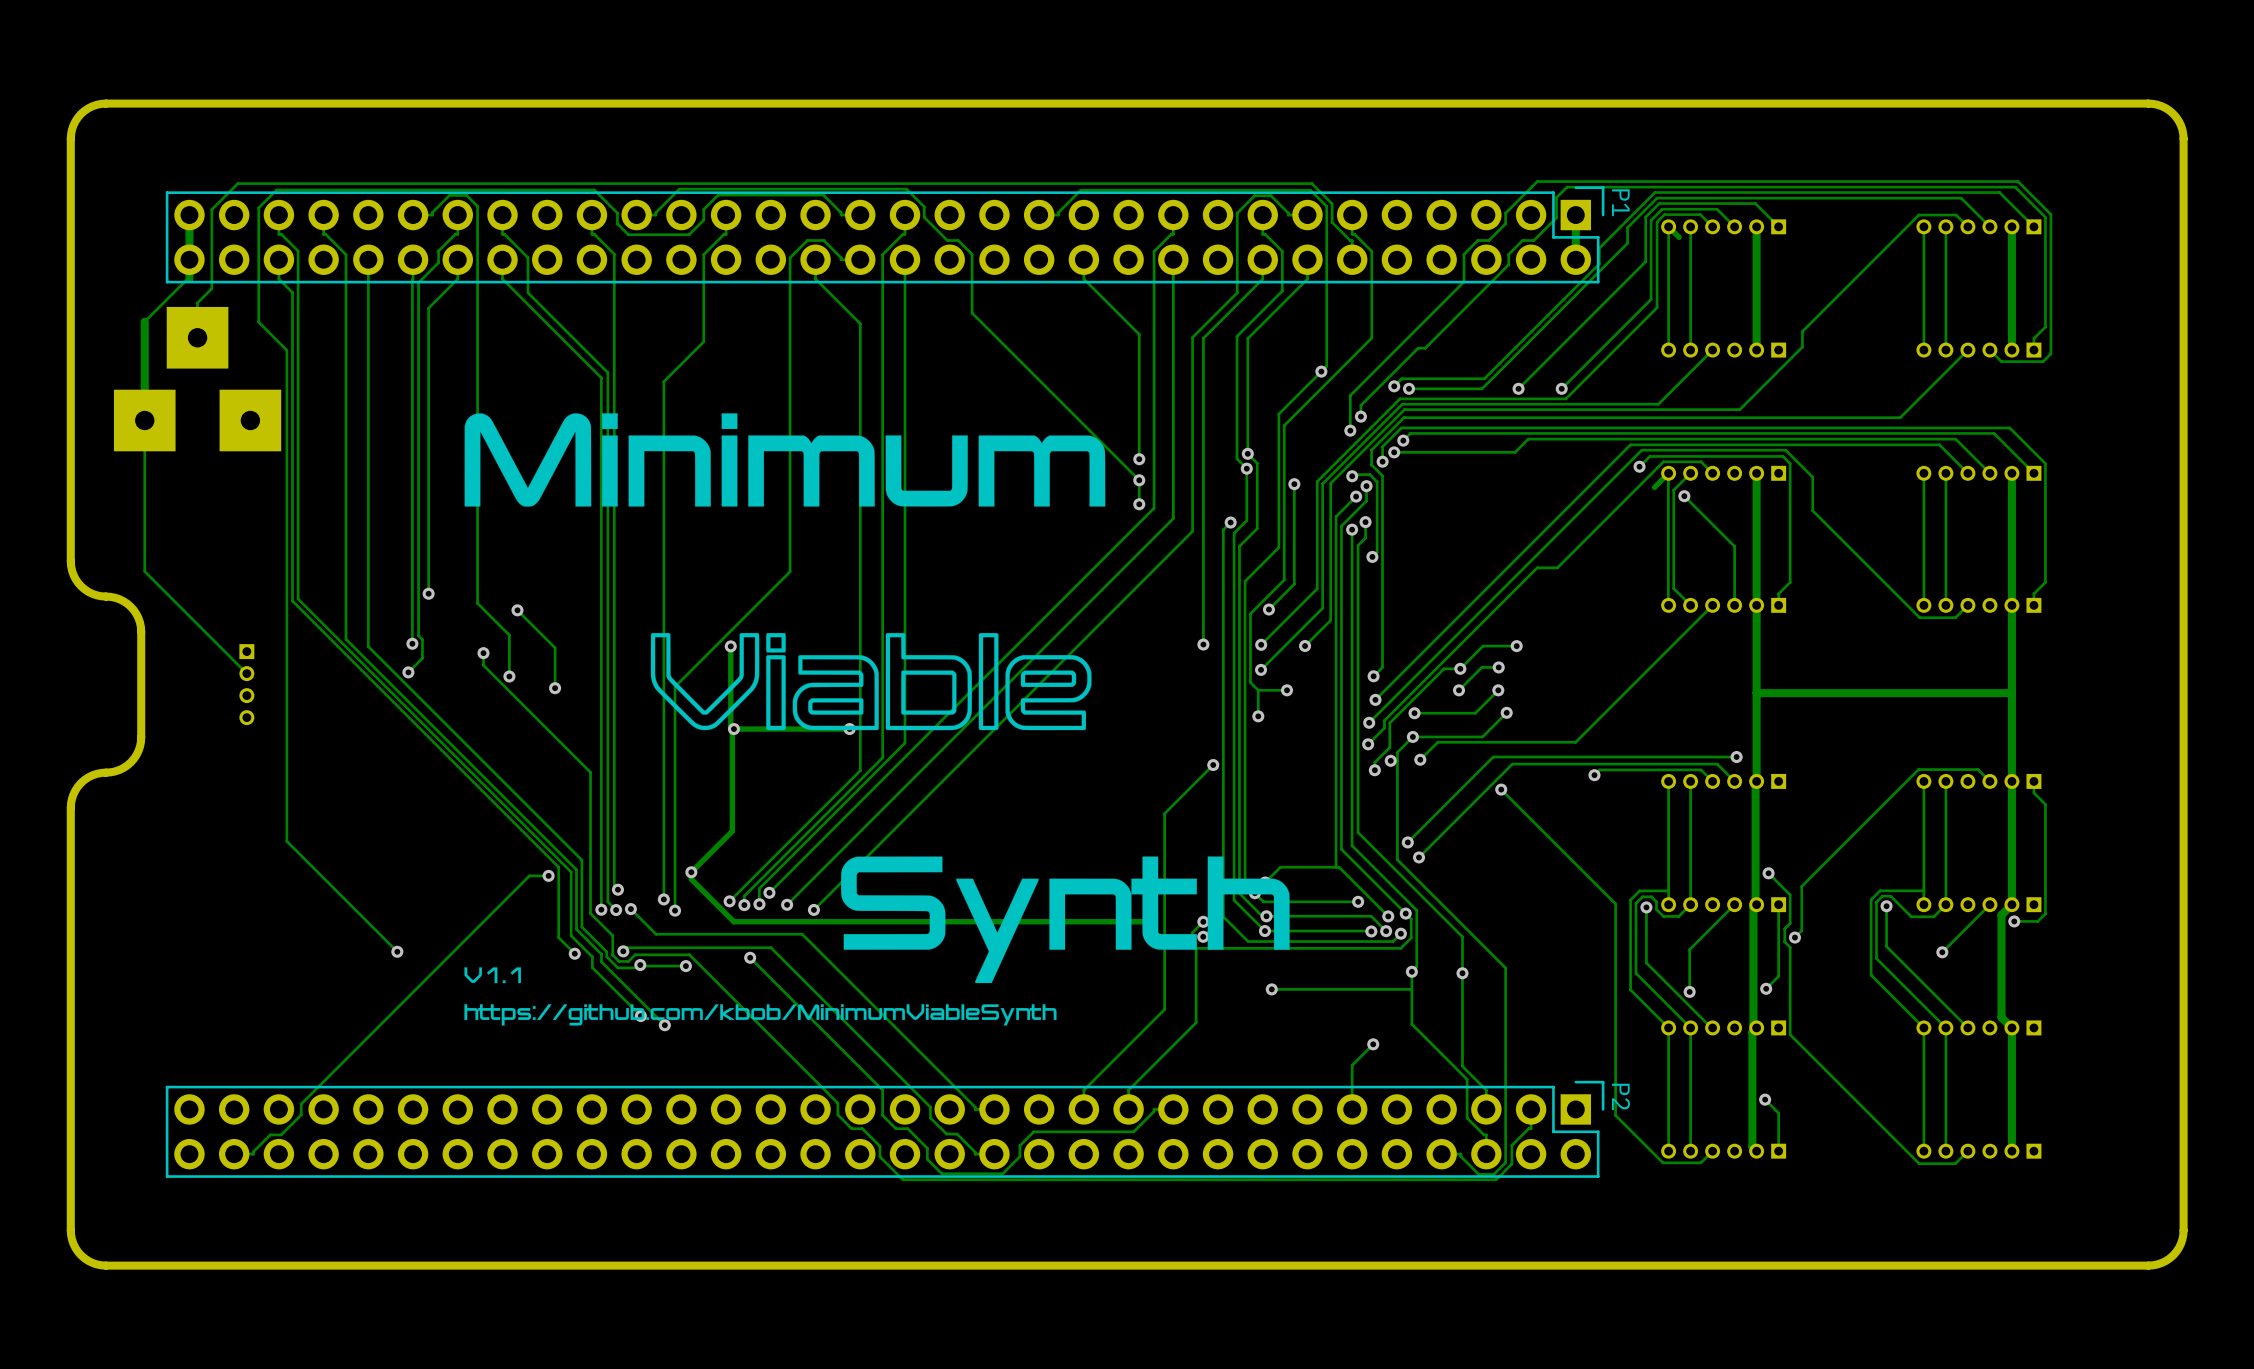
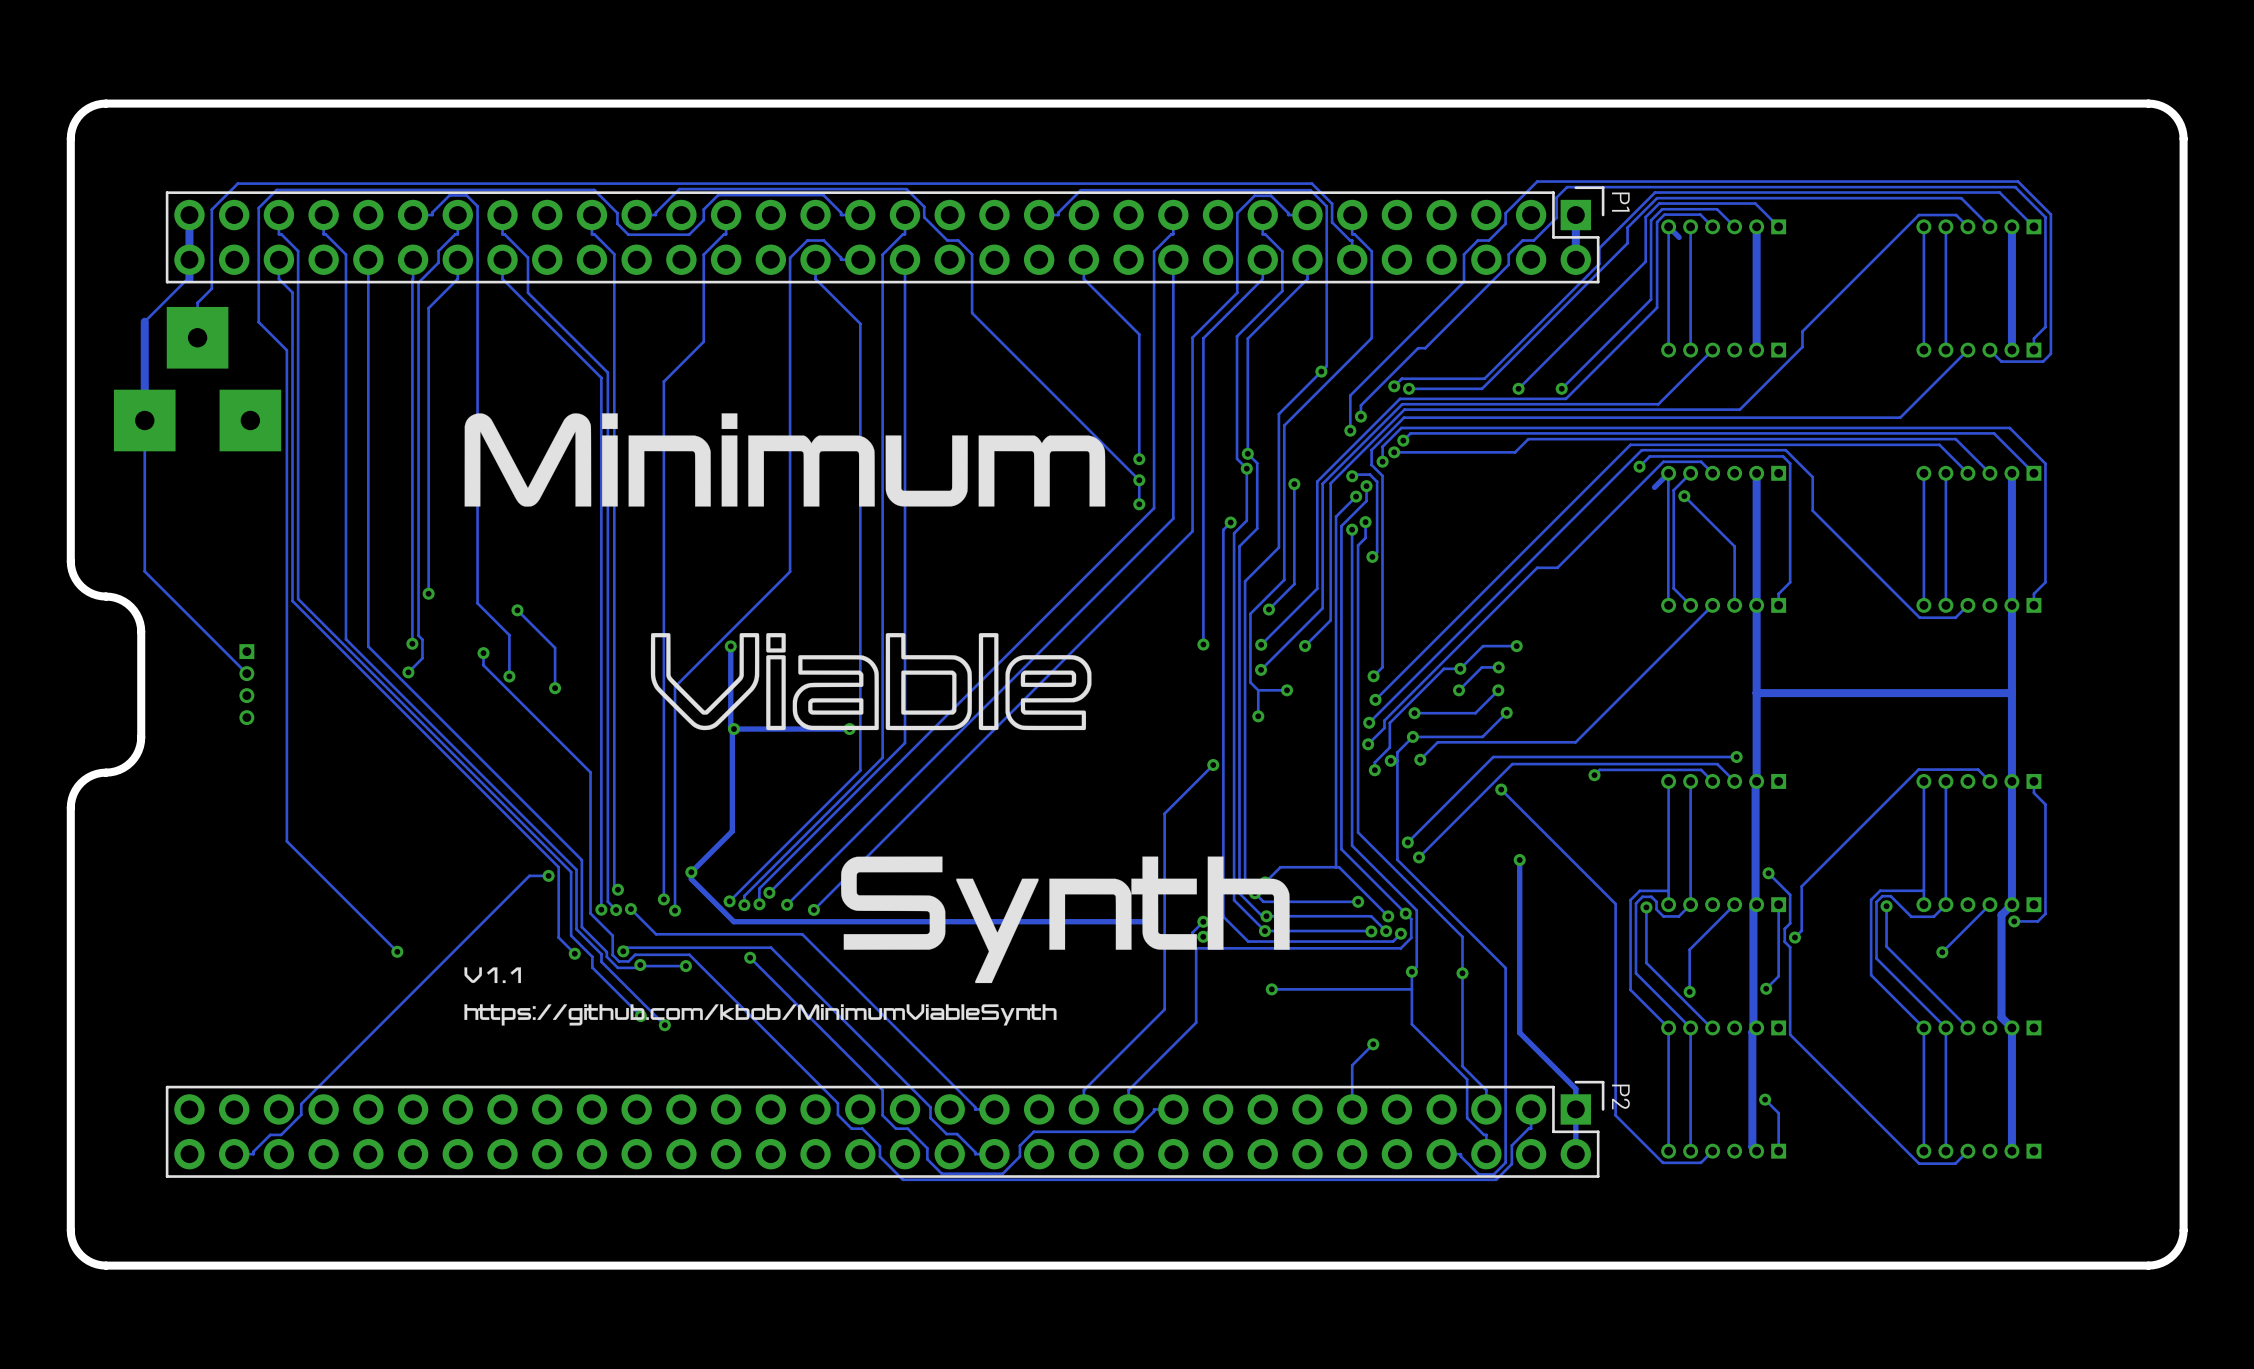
track: none -> (1519, 859) (1519, 1032) (1575, 1088) (1575, 1154)
via: none -> (1519, 859)

